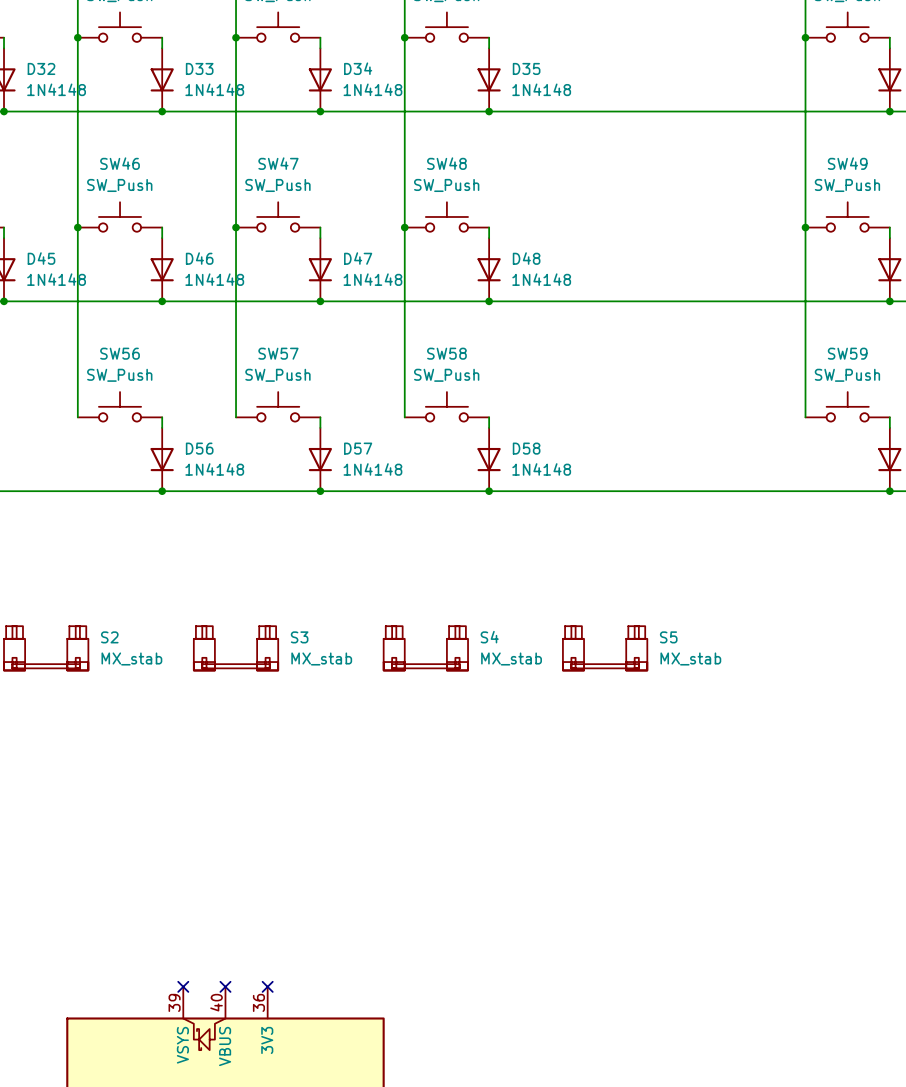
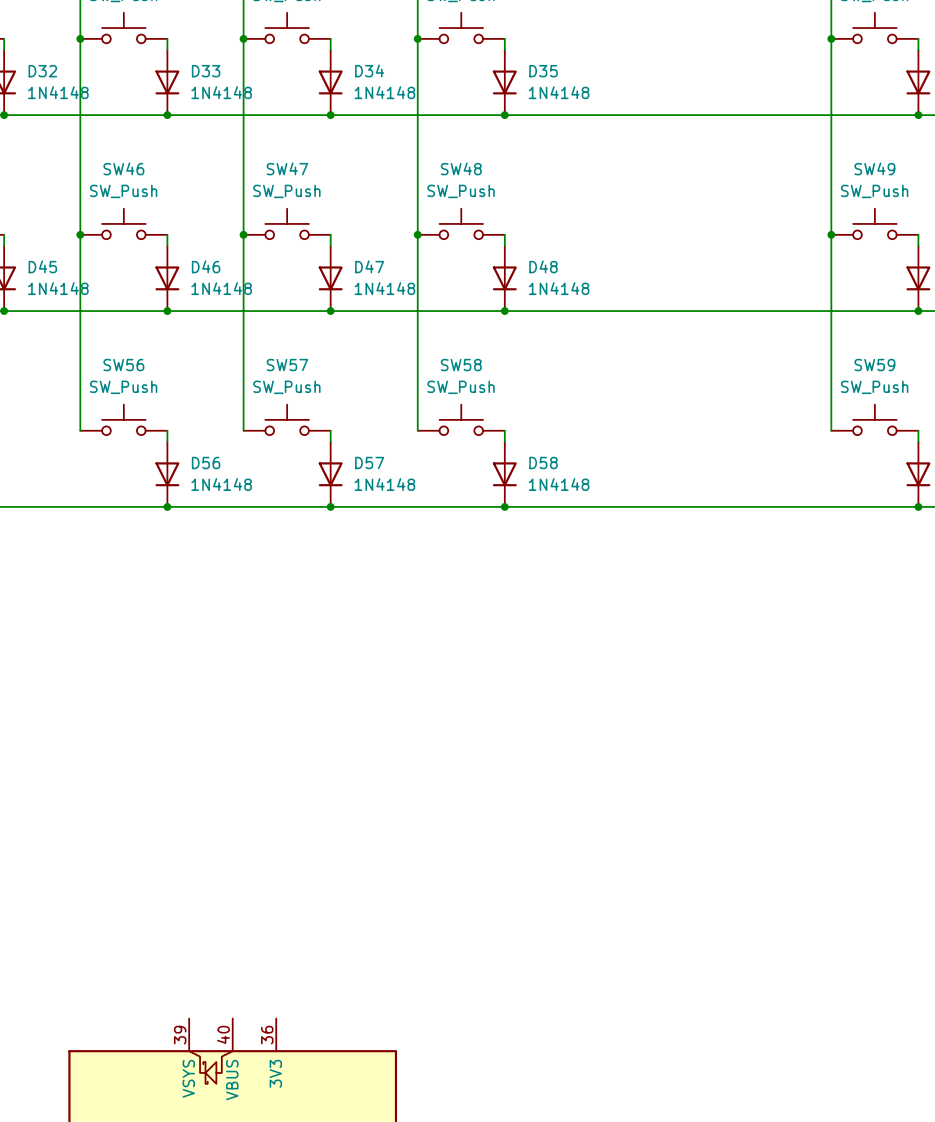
S2: MX_stab (46, 648) -> none
S3: MX_stab (236, 648) -> none
S4: MX_stab (425, 648) -> none
S5: MX_stab (605, 648) -> none
no-connect mark: (183, 986) -> none
no-connect mark: (225, 986) -> none
no-connect mark: (267, 986) -> none

